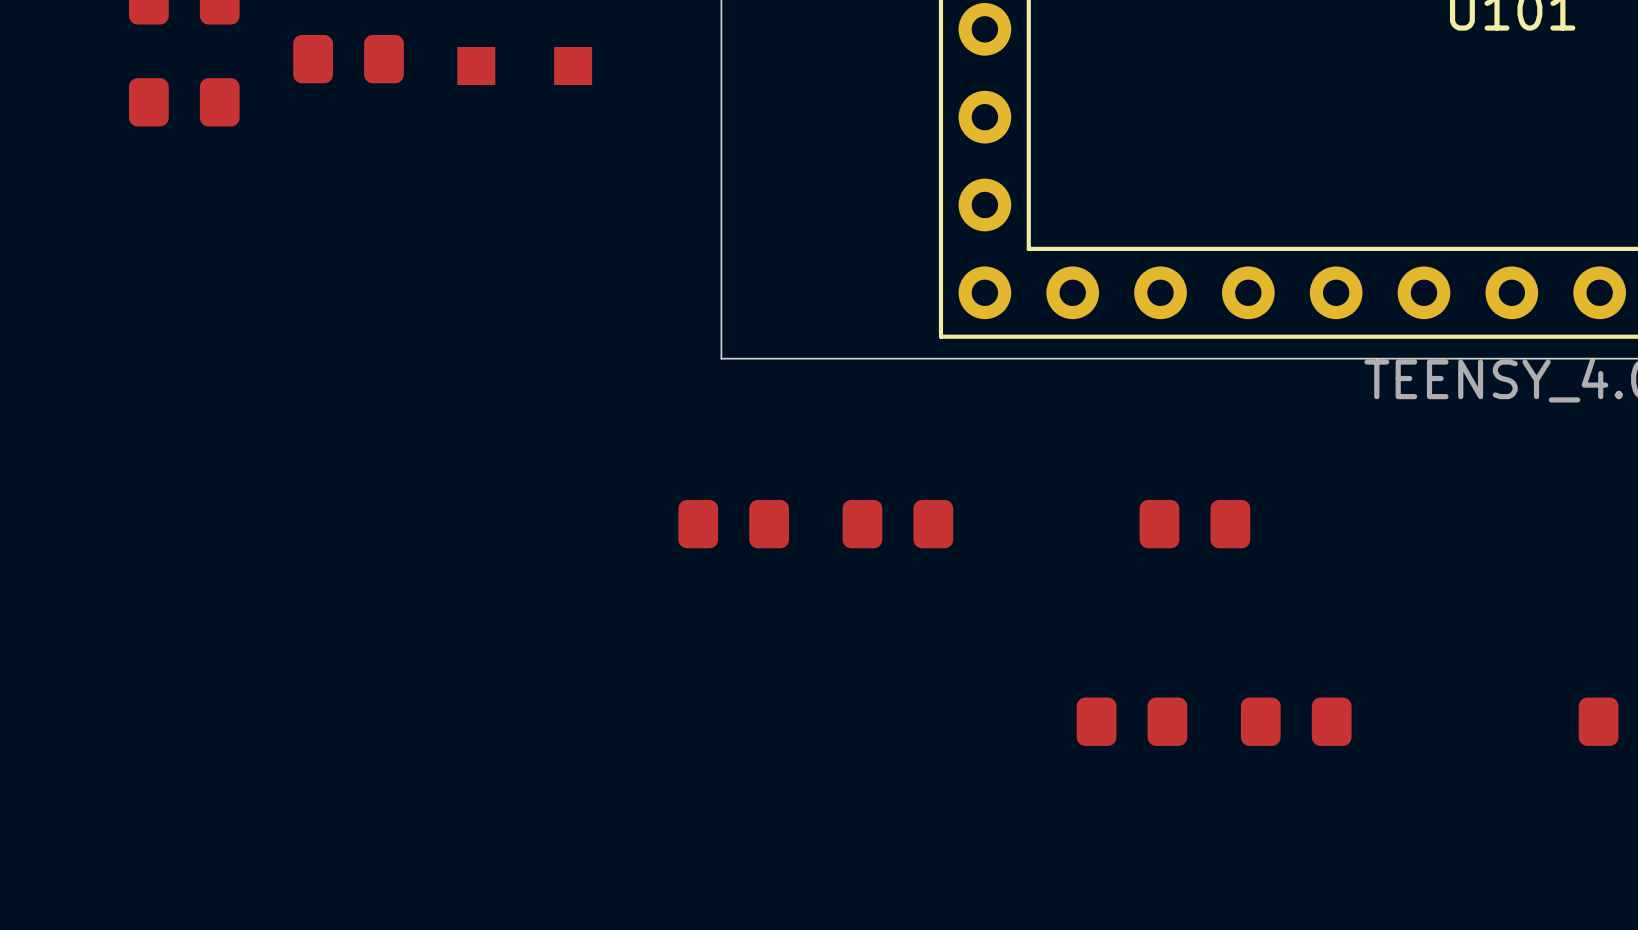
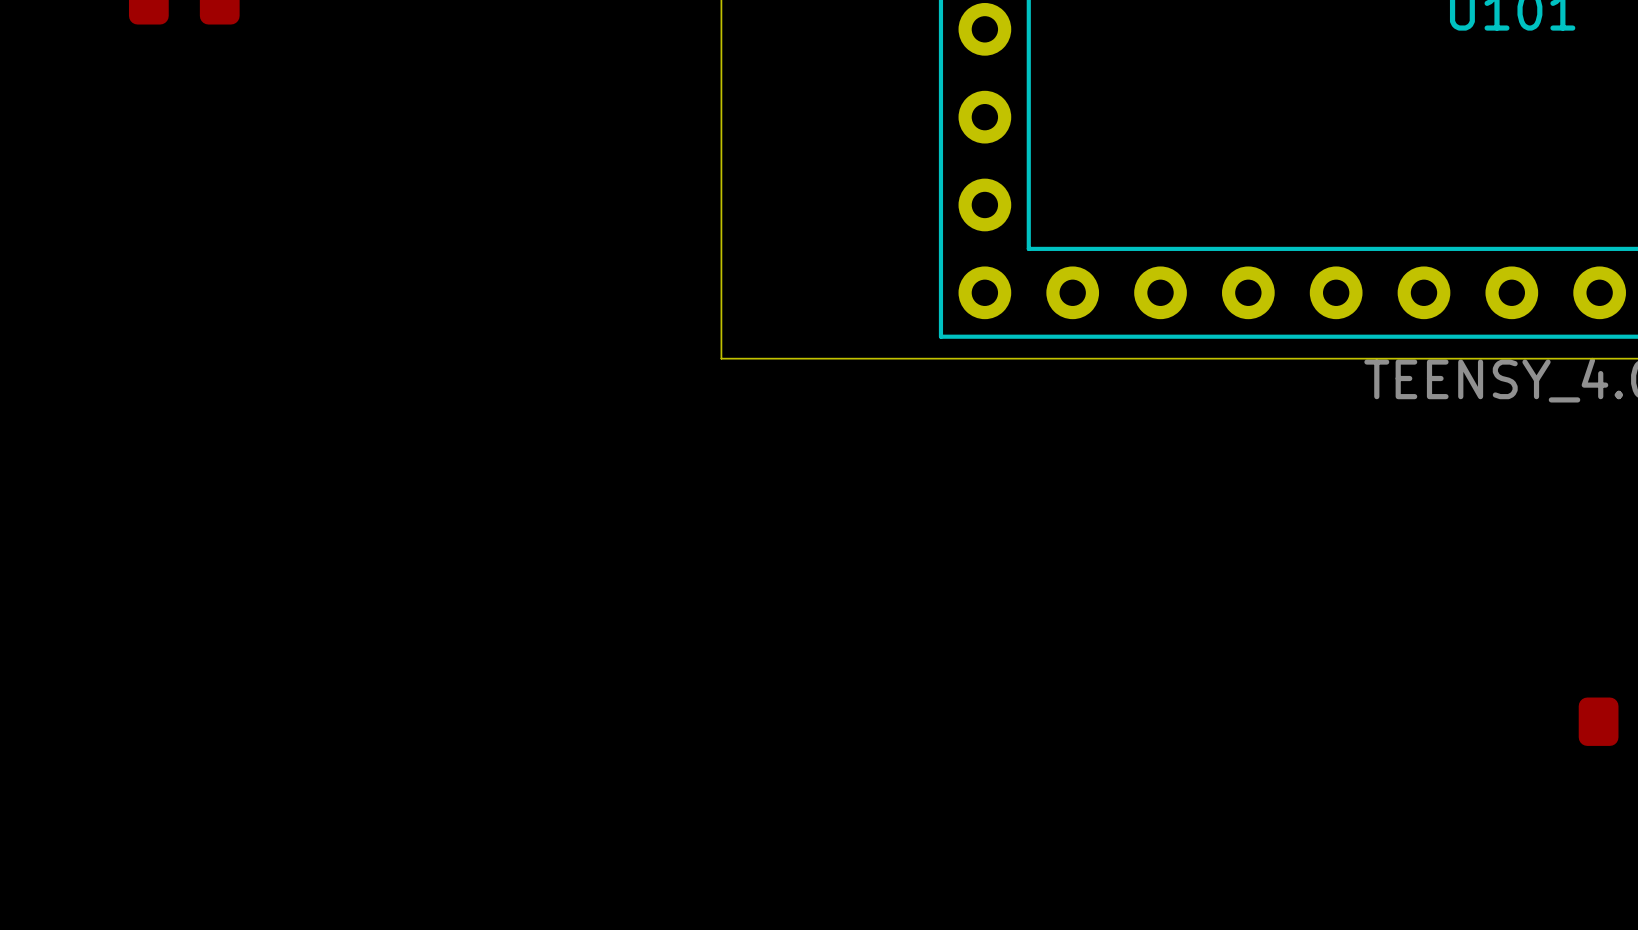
part: (348, 59) -> none
part: (524, 66) -> none
part: (184, 102) -> none
part: (733, 524) -> none
part: (897, 524) -> none
part: (1194, 524) -> none
part: (1132, 721) -> none
part: (1296, 721) -> none

